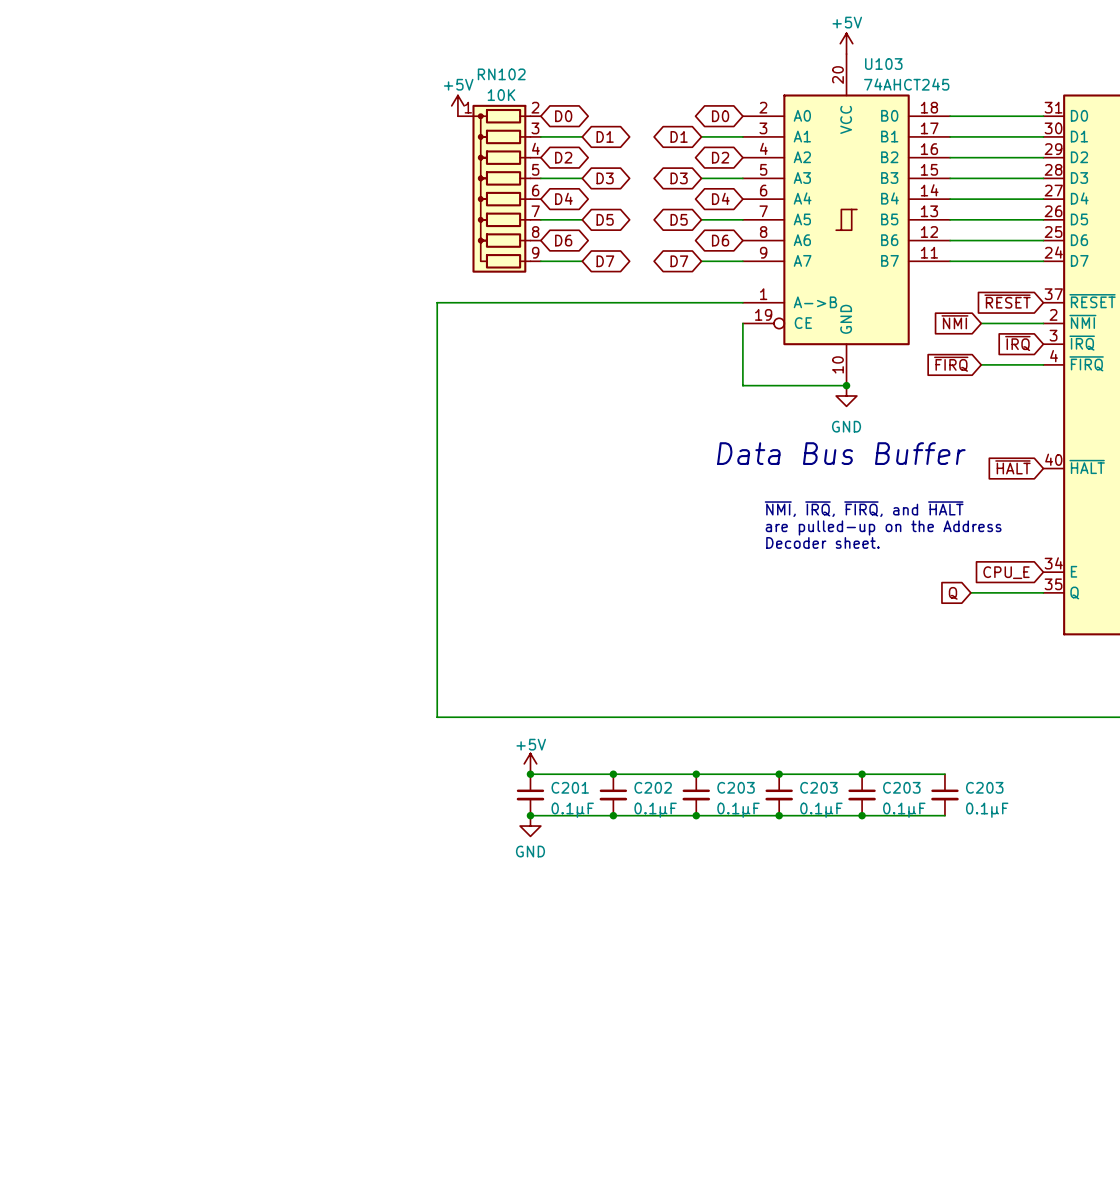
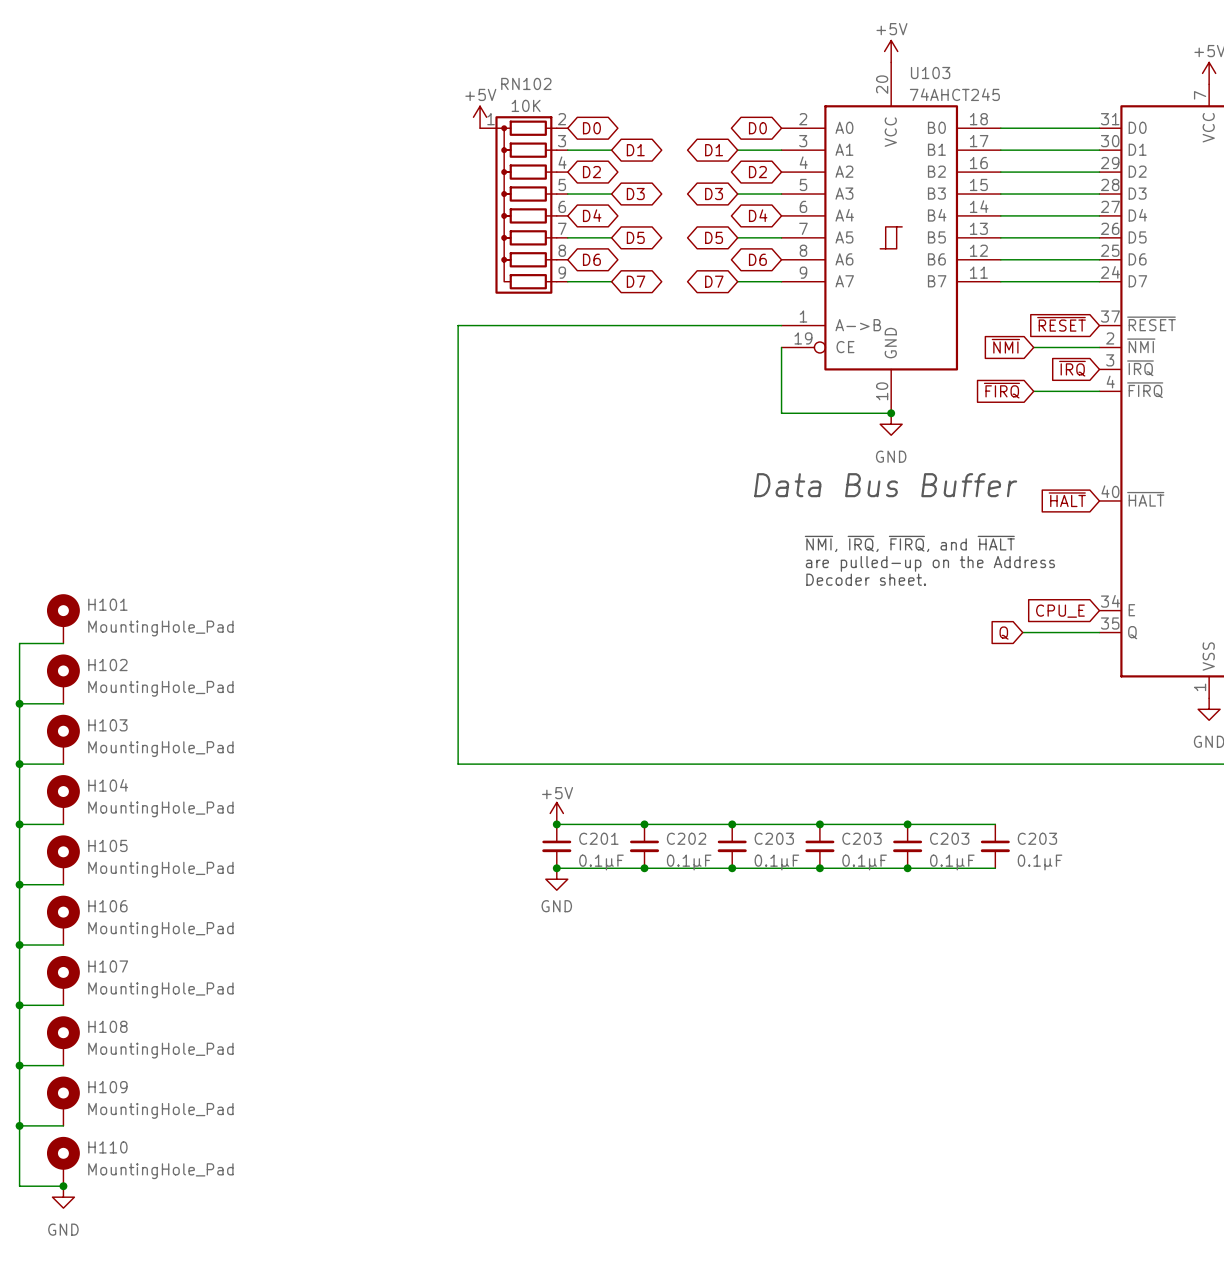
H101: none -> MountingHole_Pad (63, 618)
wire: none -> (63, 643) (19, 643) (19, 1186) (63, 1186)
H102: none -> MountingHole_Pad (63, 679)
wire: none -> (19, 703) (63, 703)
junction: none -> (19, 703)
H103: none -> MountingHole_Pad (63, 739)
wire: none -> (19, 764) (63, 764)
junction: none -> (19, 764)
H104: none -> MountingHole_Pad (63, 799)
wire: none -> (19, 824) (63, 824)
junction: none -> (19, 824)
H105: none -> MountingHole_Pad (63, 860)
wire: none -> (19, 884) (63, 884)
junction: none -> (19, 884)
H106: none -> MountingHole_Pad (63, 920)
wire: none -> (19, 945) (63, 945)
junction: none -> (19, 945)
H107: none -> MountingHole_Pad (63, 980)
wire: none -> (19, 1005) (63, 1005)
junction: none -> (19, 1005)
H108: none -> MountingHole_Pad (63, 1040)
wire: none -> (19, 1065) (63, 1065)
junction: none -> (19, 1065)
H109: none -> MountingHole_Pad (63, 1101)
wire: none -> (19, 1125) (63, 1125)
junction: none -> (19, 1125)
H110: none -> MountingHole_Pad (63, 1161)
junction: none -> (63, 1186)
power symbol: none -> GND (63, 1197)

